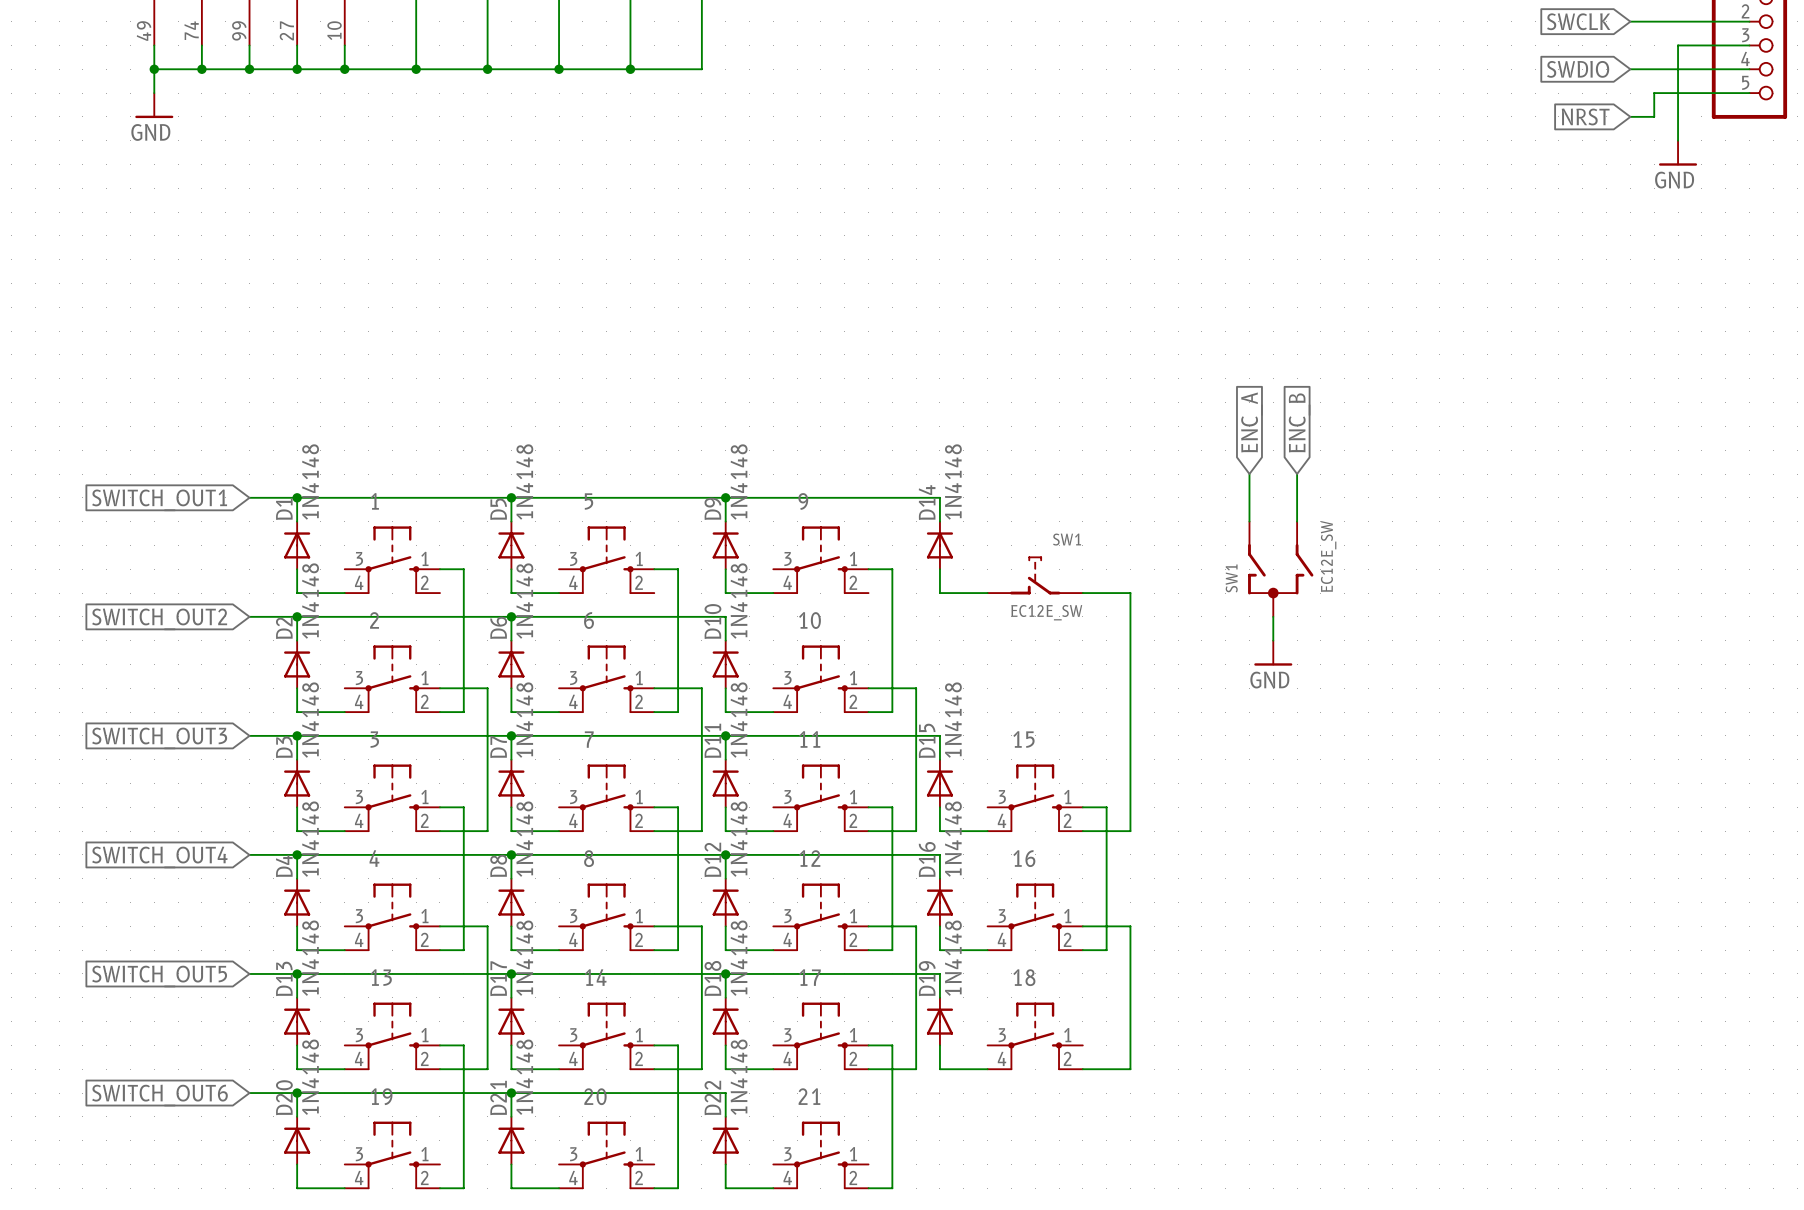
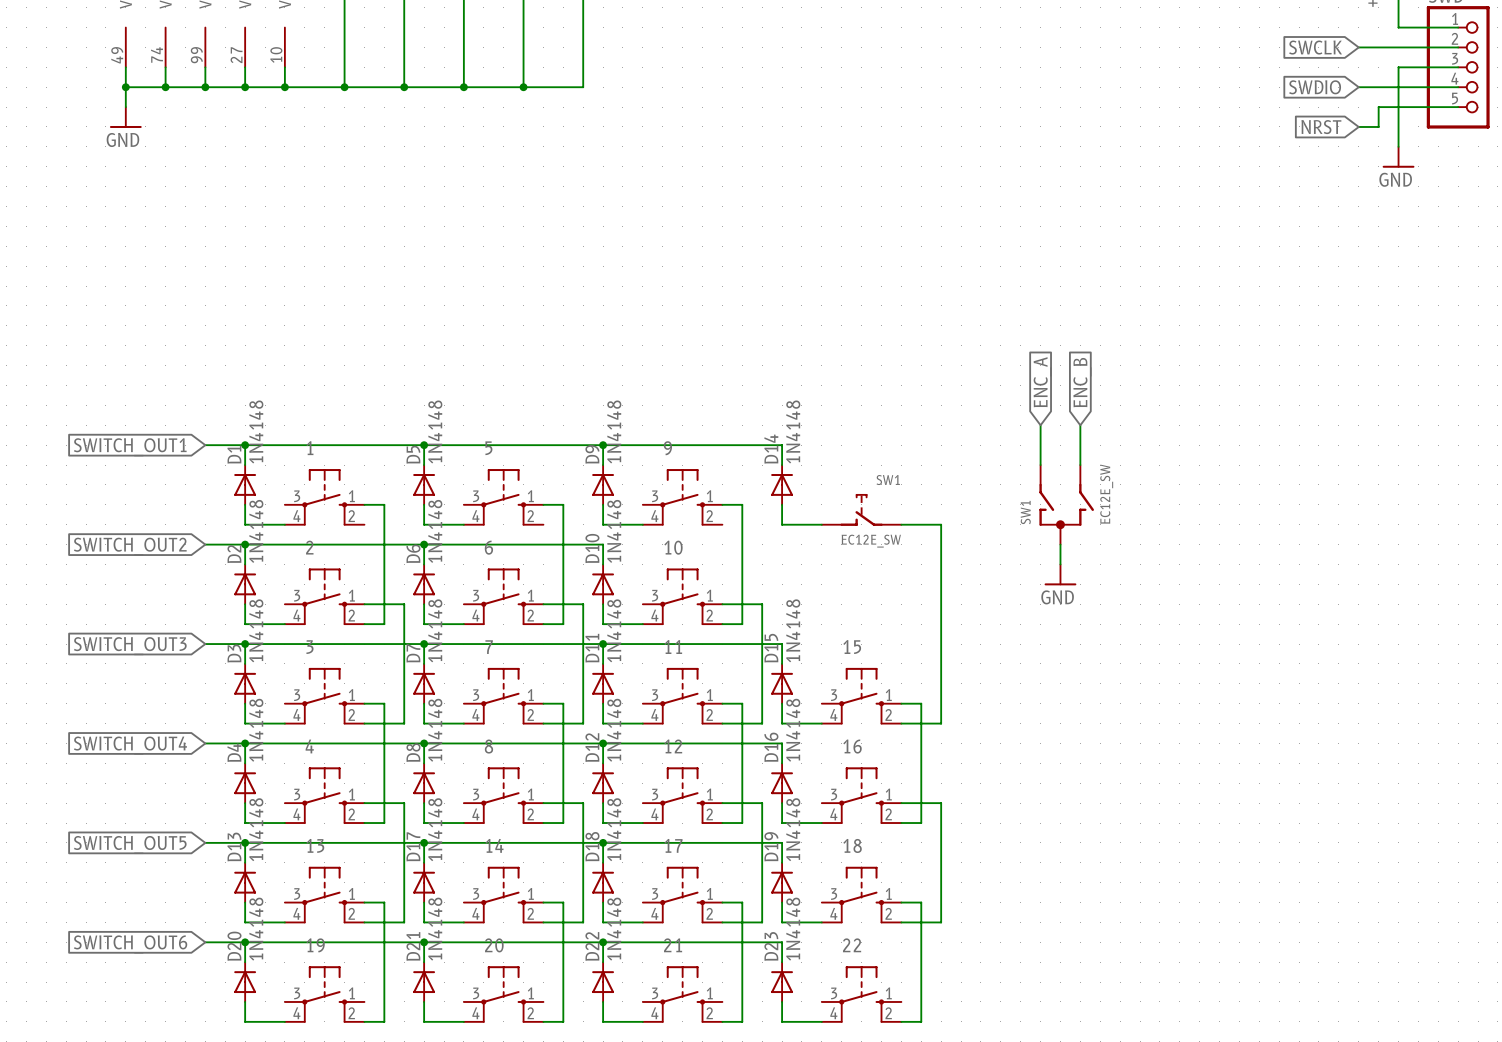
wire: none -> (901, 902) (921, 902) (921, 1021) (901, 1021)
wire: none -> (603, 942) (782, 942) (782, 962)
junction: none -> (603, 942)
D23: none -> 1N4148 (782, 982)
22: none -> (861, 994)
wire: none -> (782, 1001) (782, 1021) (821, 1021)

